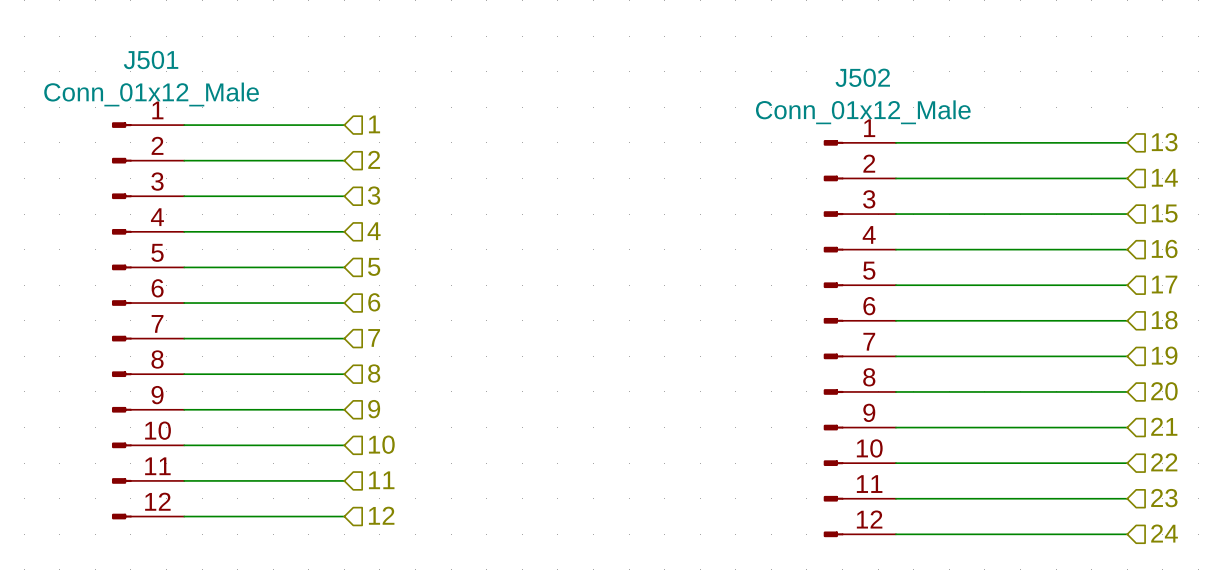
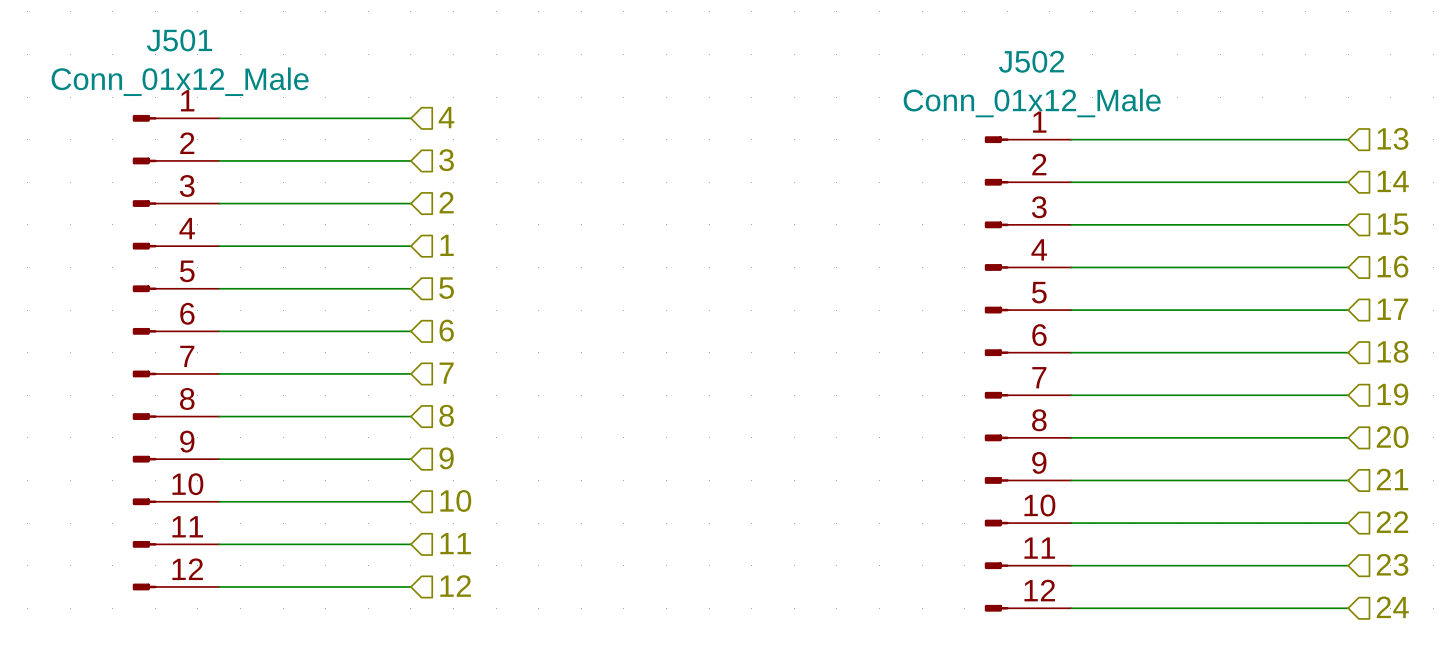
hierarchical label: 1 (374, 124) -> 4 (446, 117)
hierarchical label: 2 (374, 159) -> 3 (446, 160)
hierarchical label: 3 (374, 195) -> 2 (446, 202)
hierarchical label: 4 (374, 231) -> 1 (447, 245)

